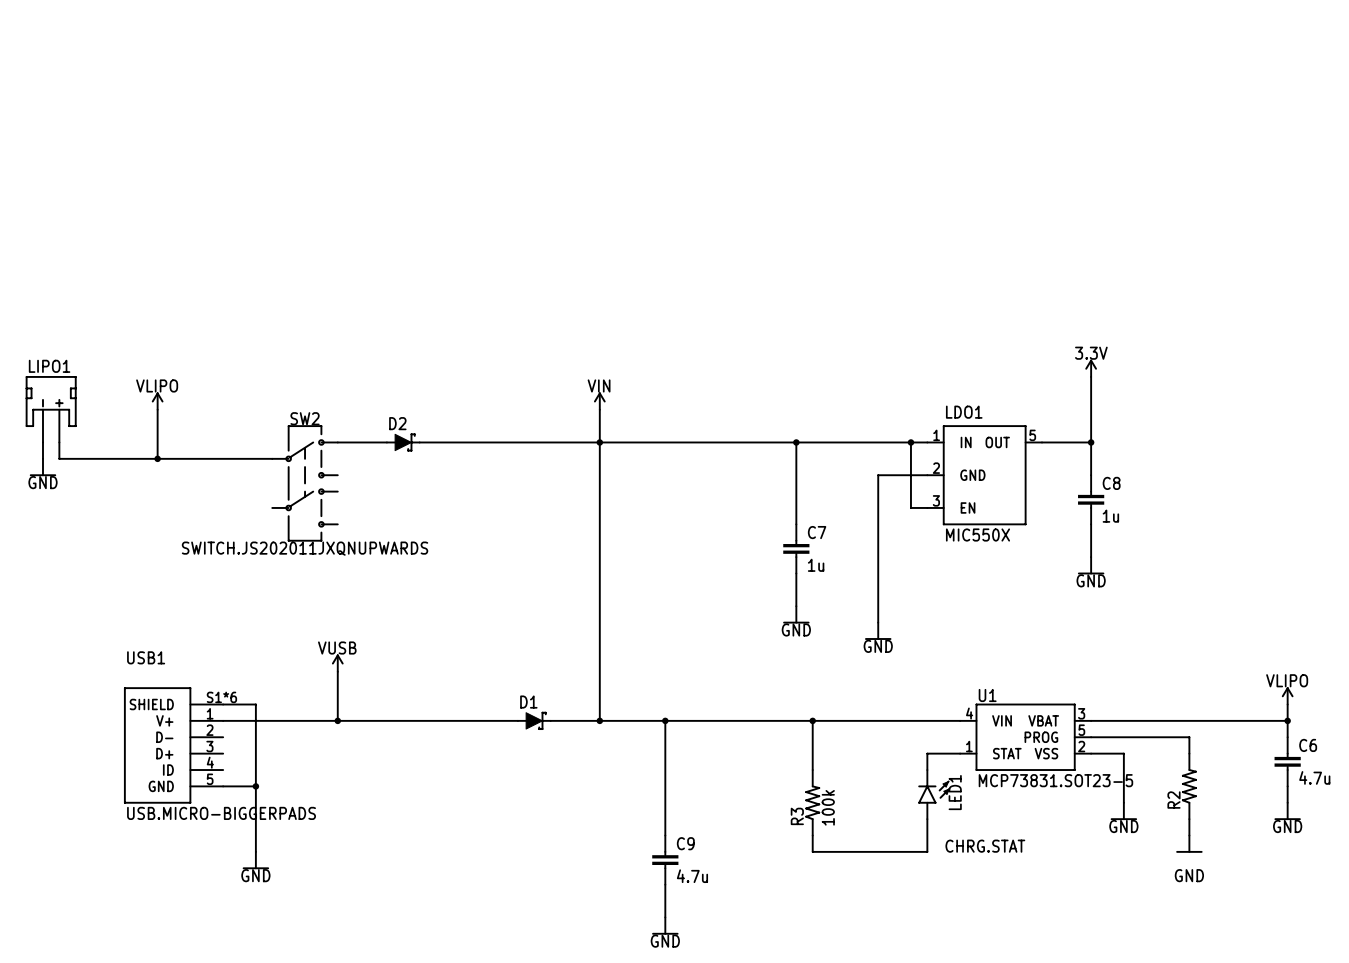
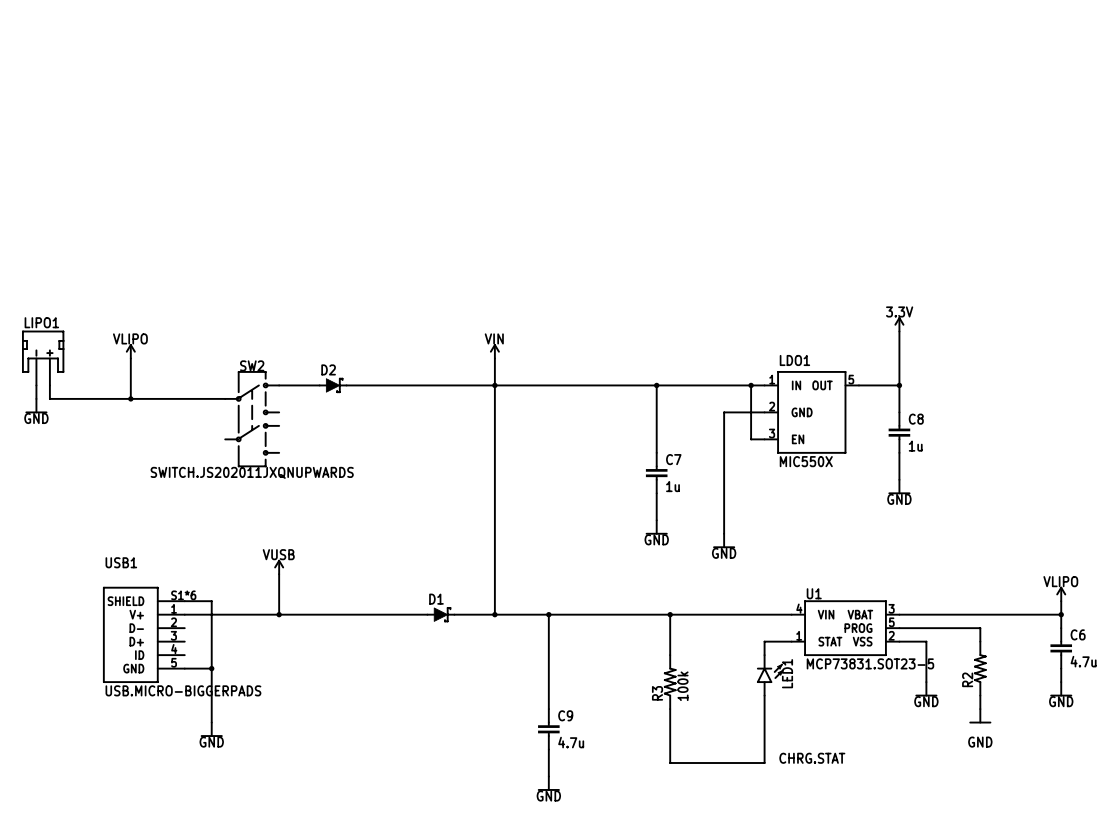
label position: CHRG.STAT (985, 846) -> CHRG.STAT (812, 758)
wire: (812, 851) (927, 851) -> (670, 722) (670, 763) (764, 763) (764, 722)

